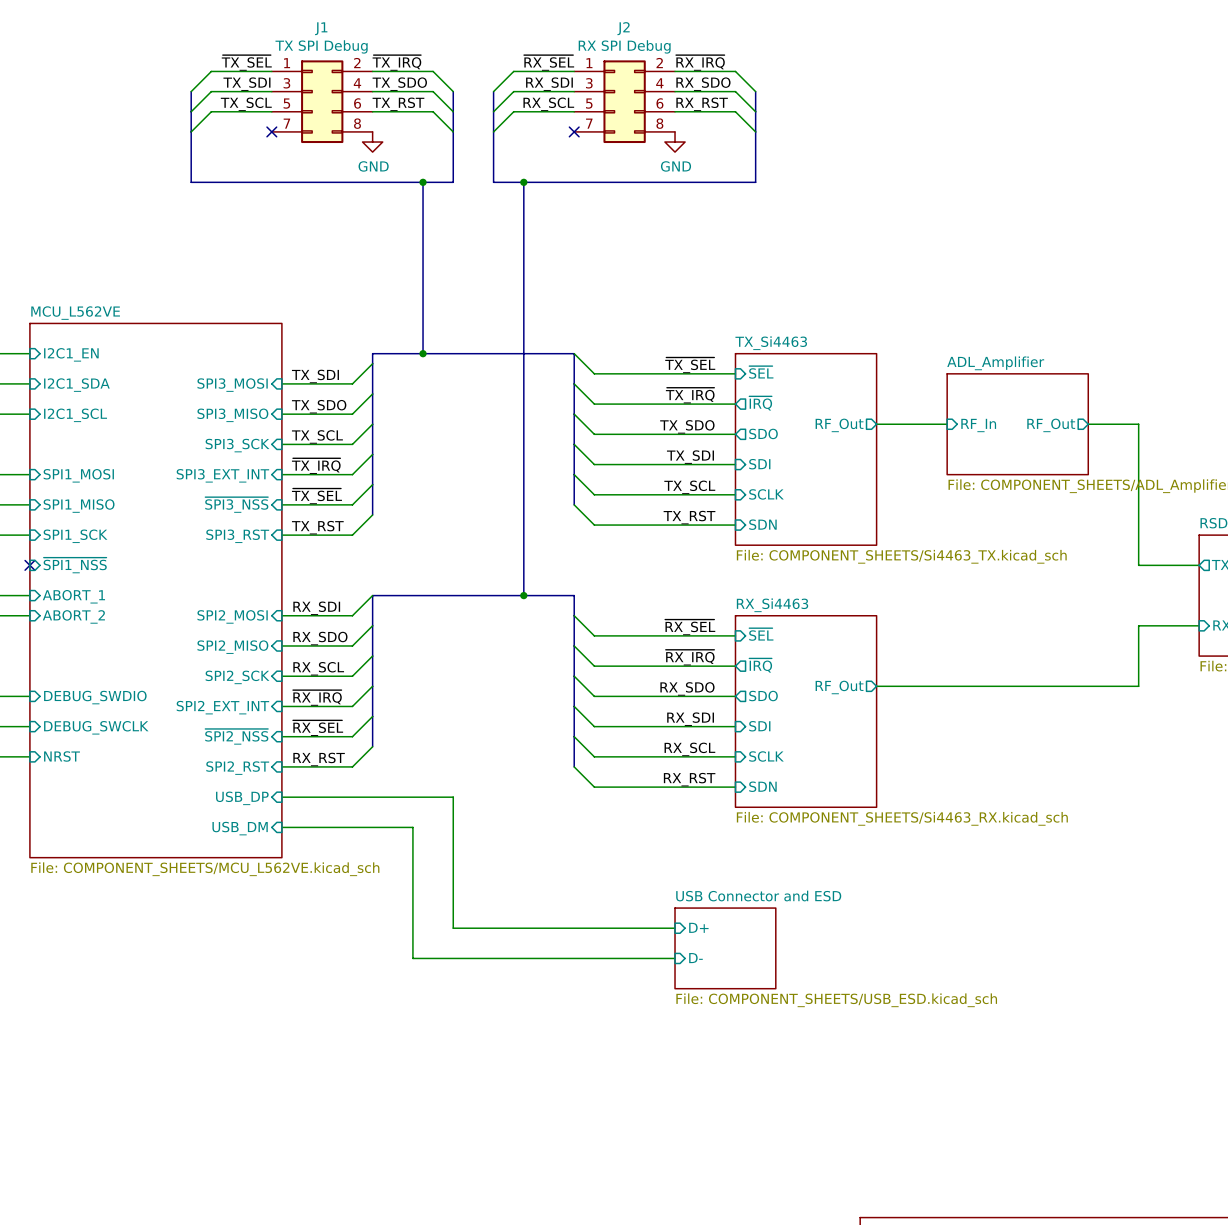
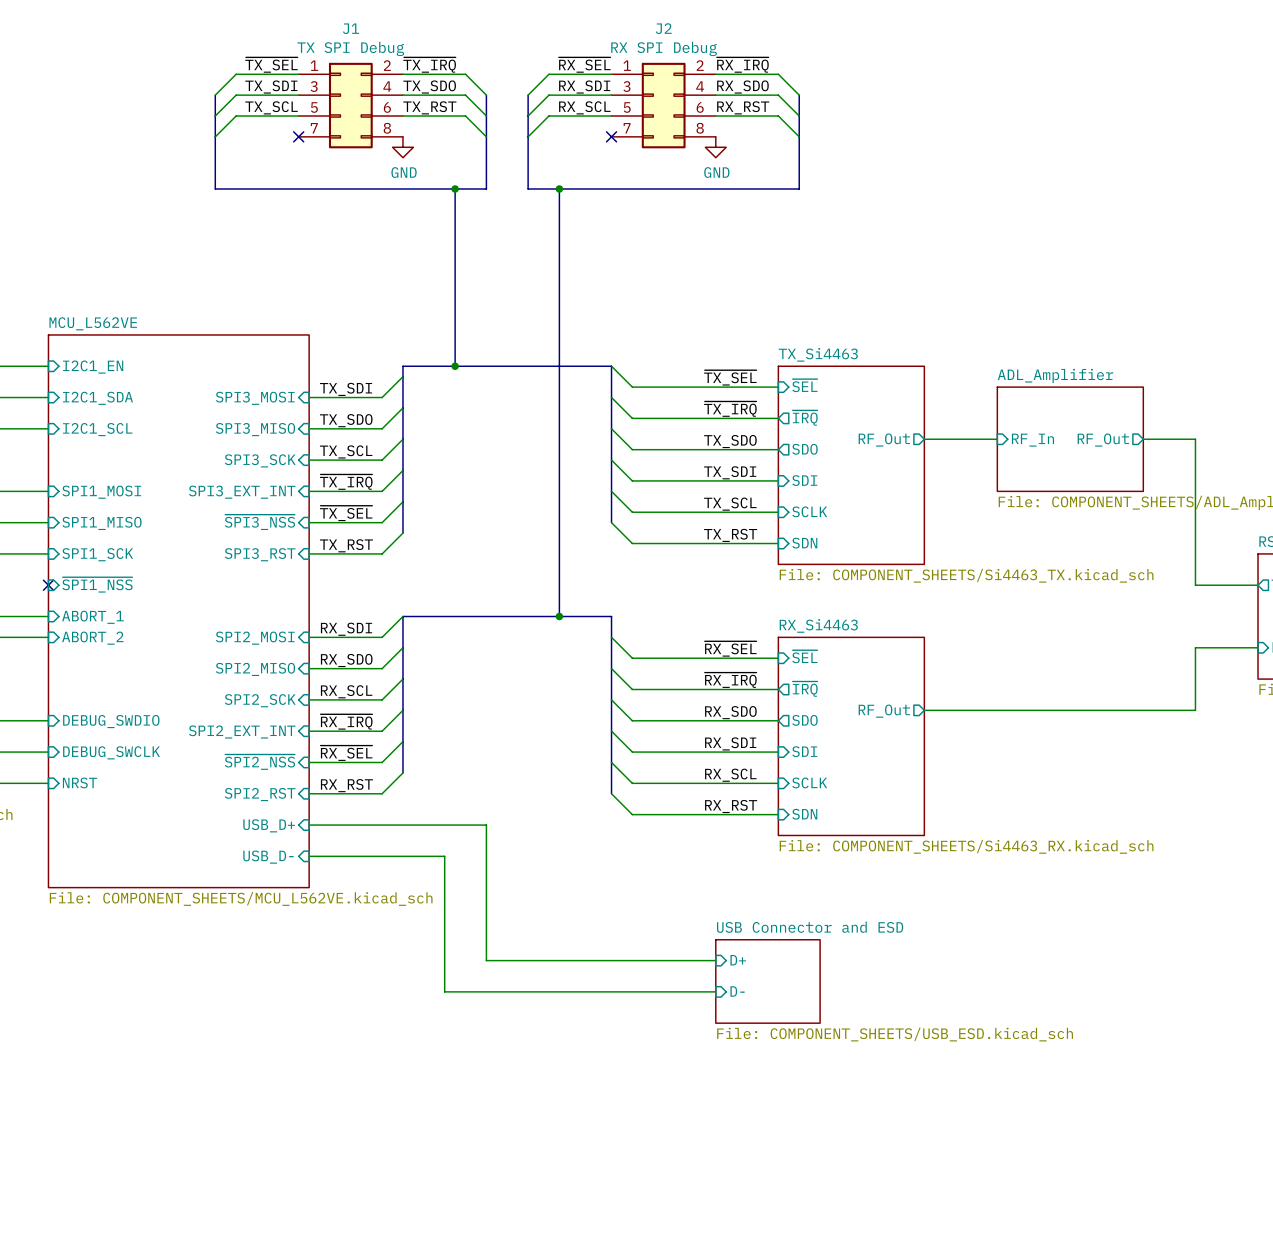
sheet pin: USB_DP (242, 798) -> USB_D+ (269, 825)
sheet pin: USB_DM (240, 828) -> USB_D- (268, 857)

